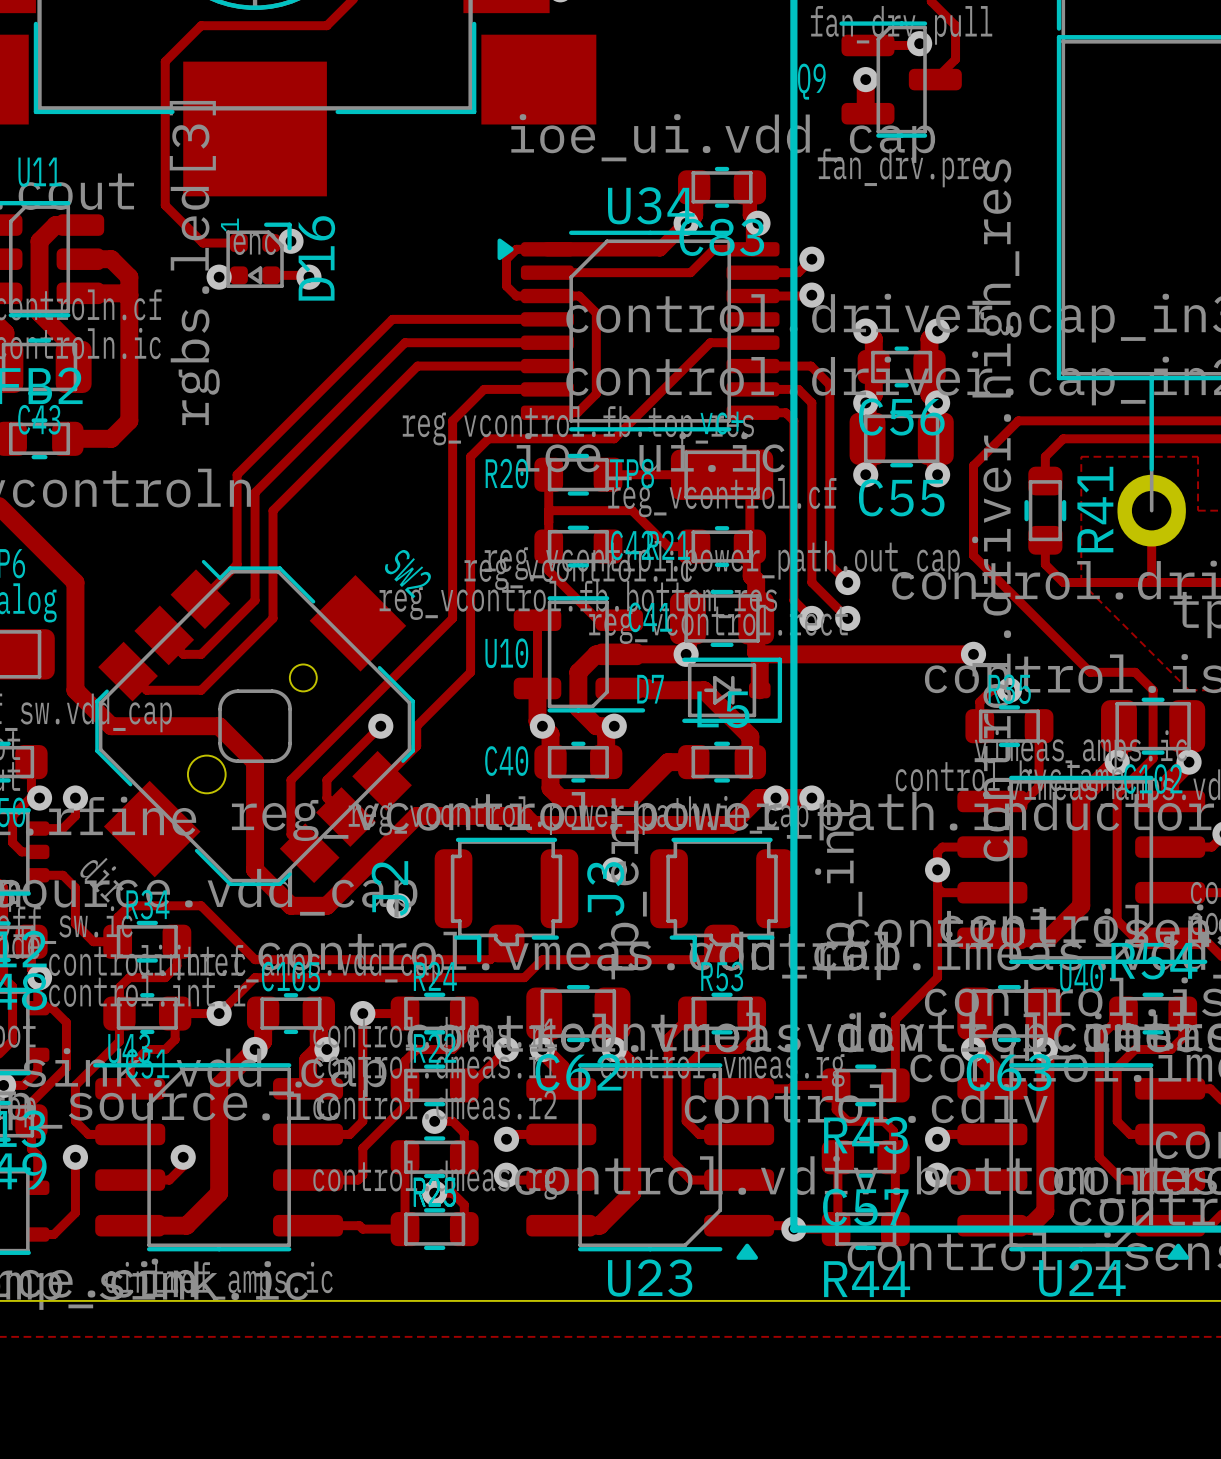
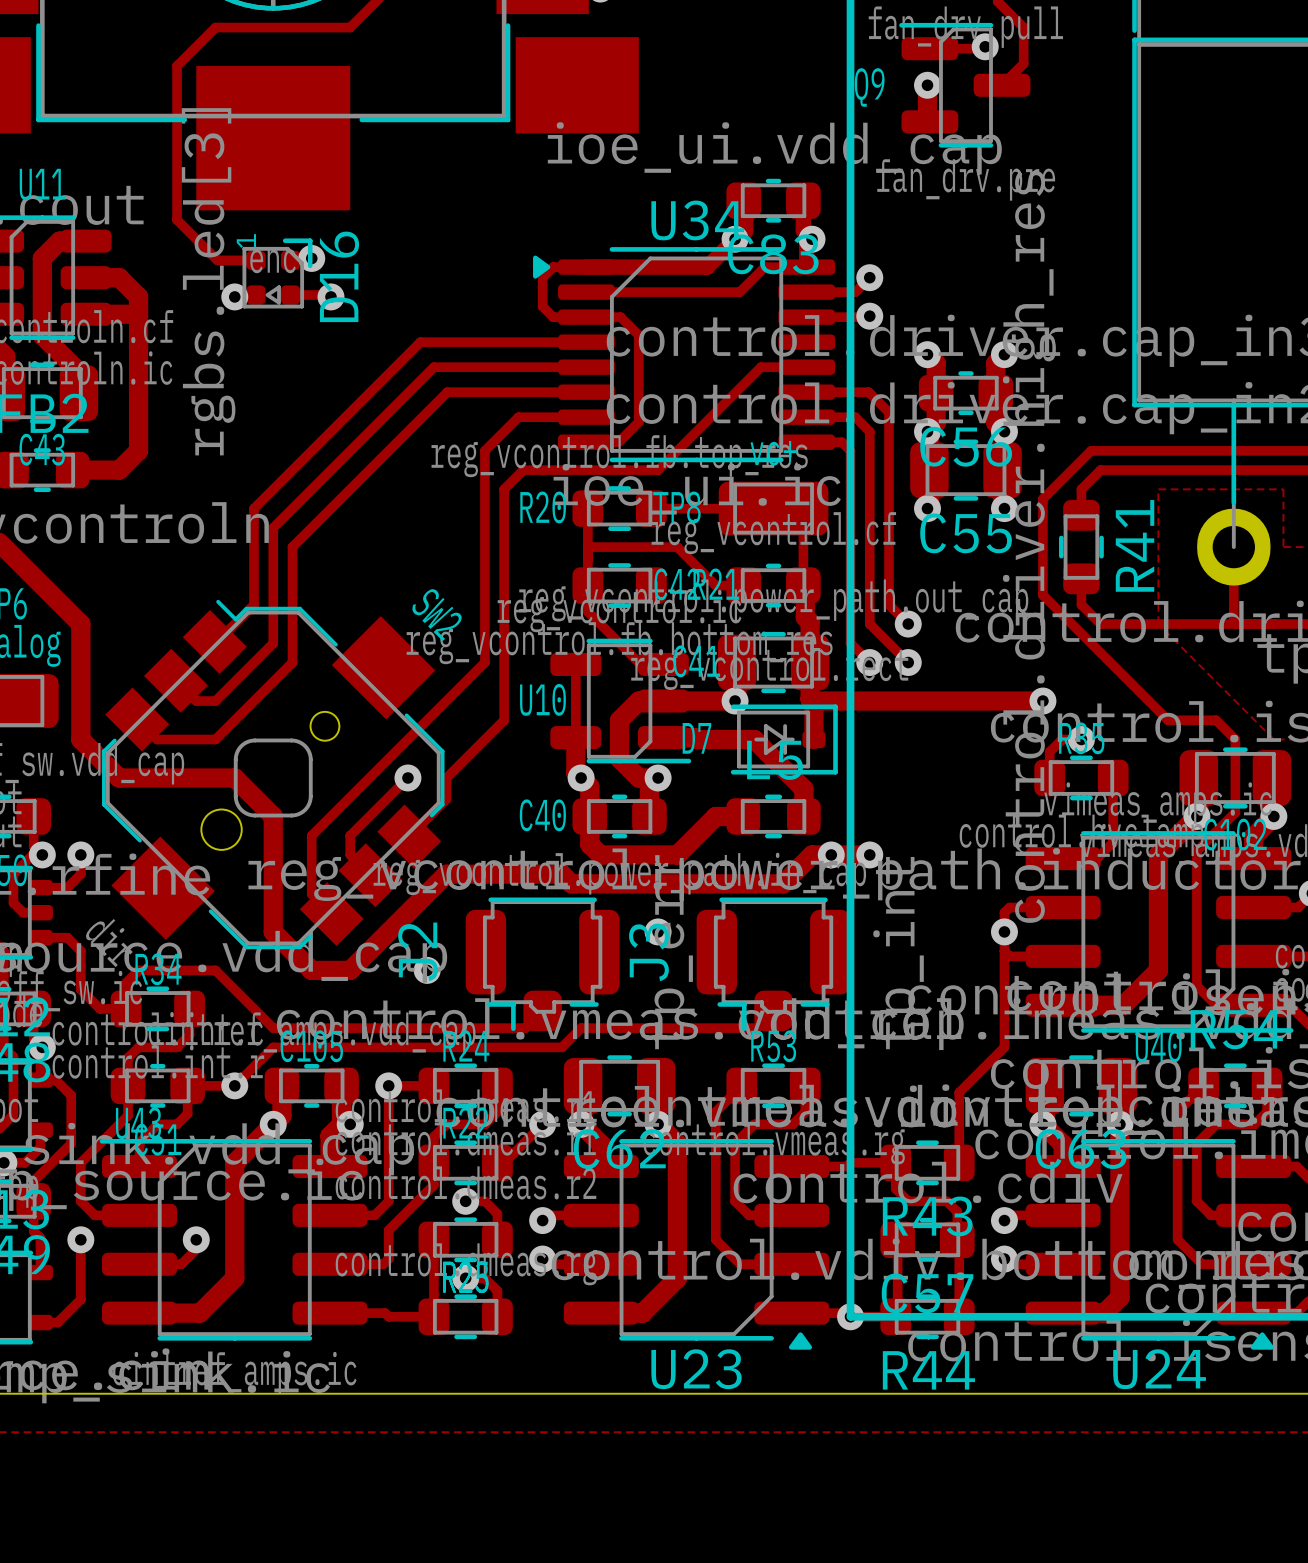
track: (1063, 438) (1045, 456) (1045, 481) -> (1139, 470) (1100, 470) (1081, 489) (1081, 515)
R41 position: (1045, 510) -> (1081, 547)
track: (1045, 540) (1045, 564) (1063, 582) -> (1081, 578) (1081, 604) (1100, 624) (1139, 624)

